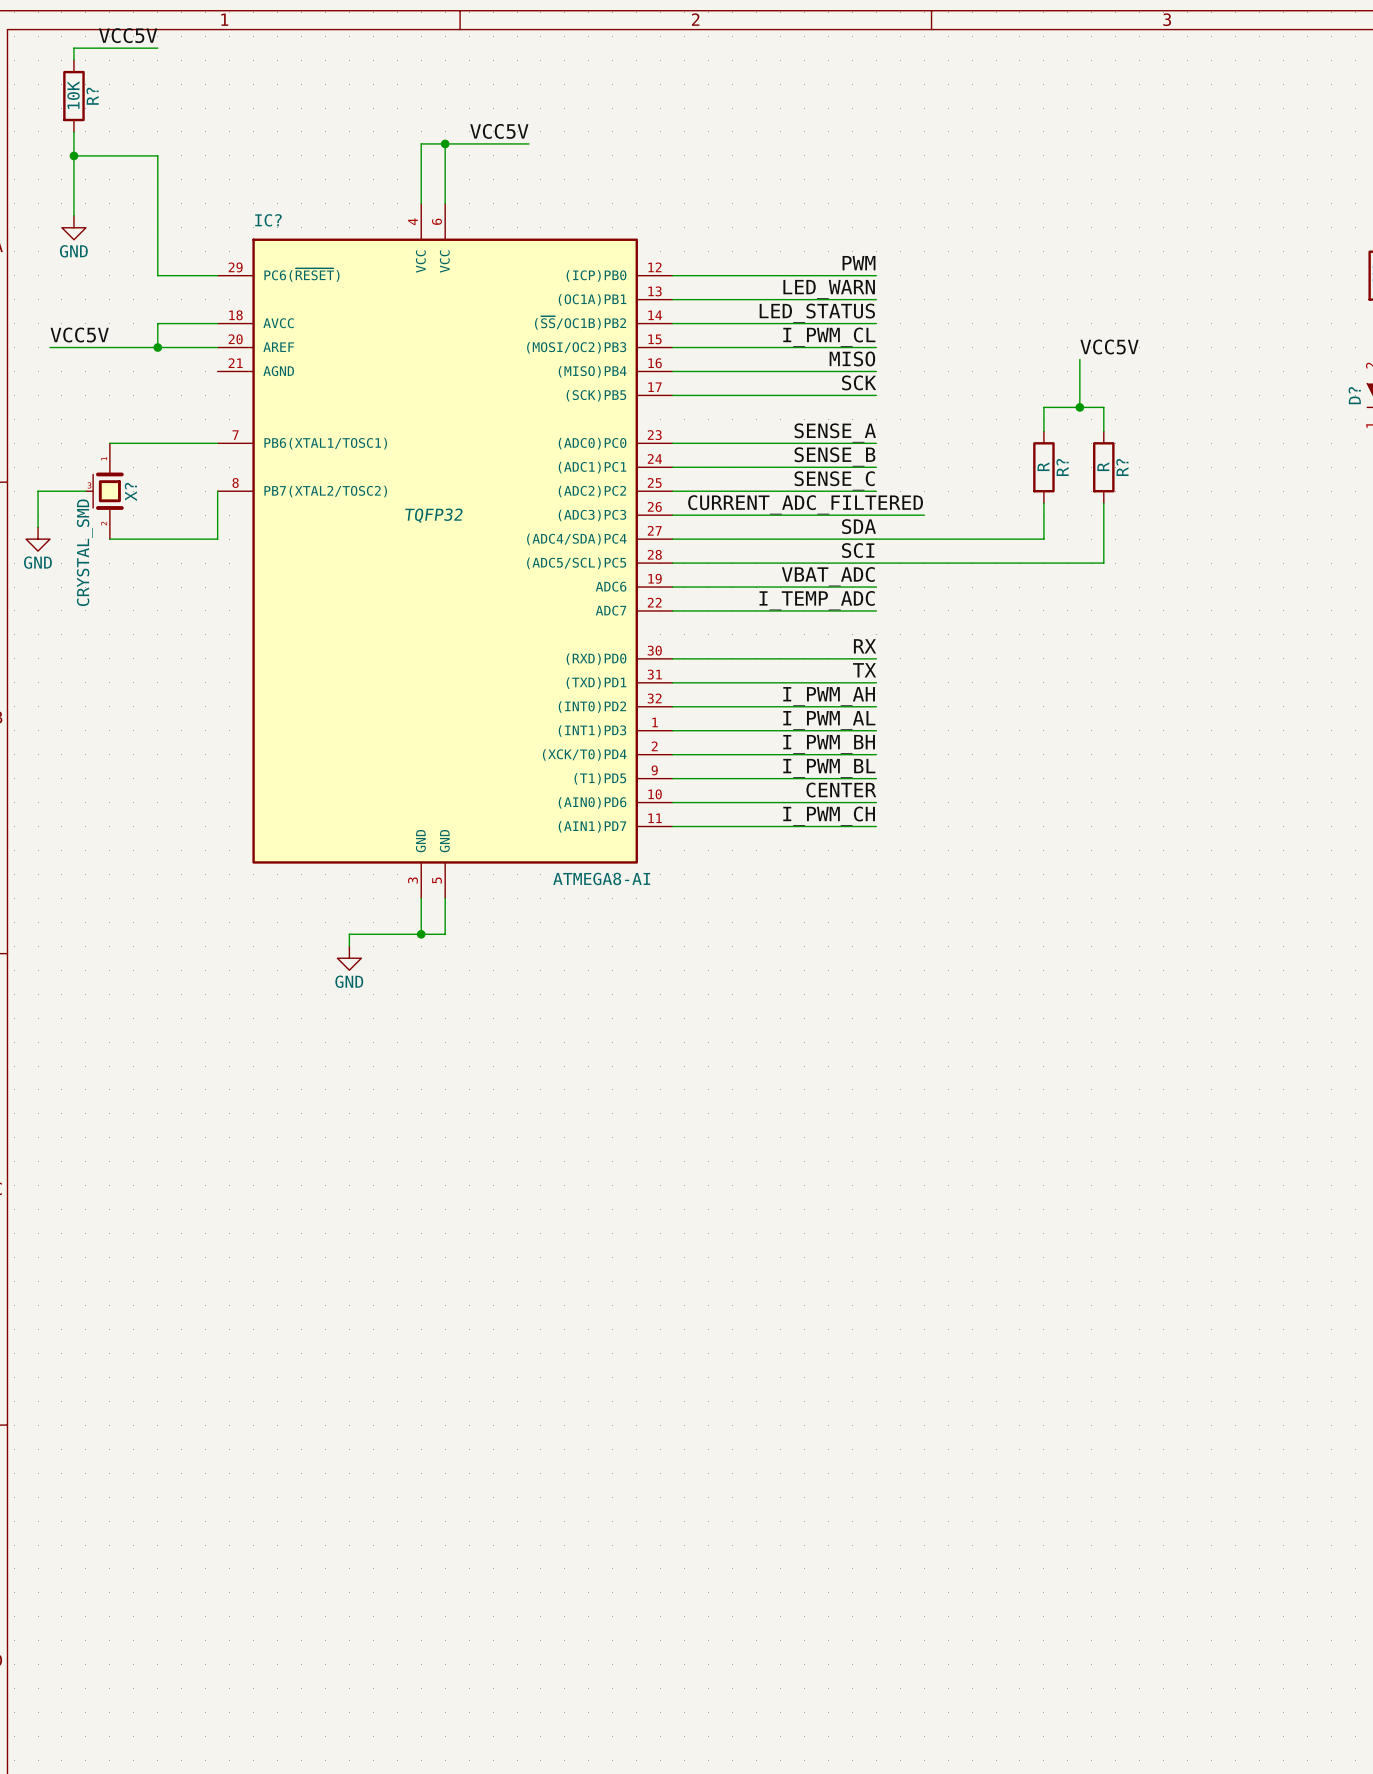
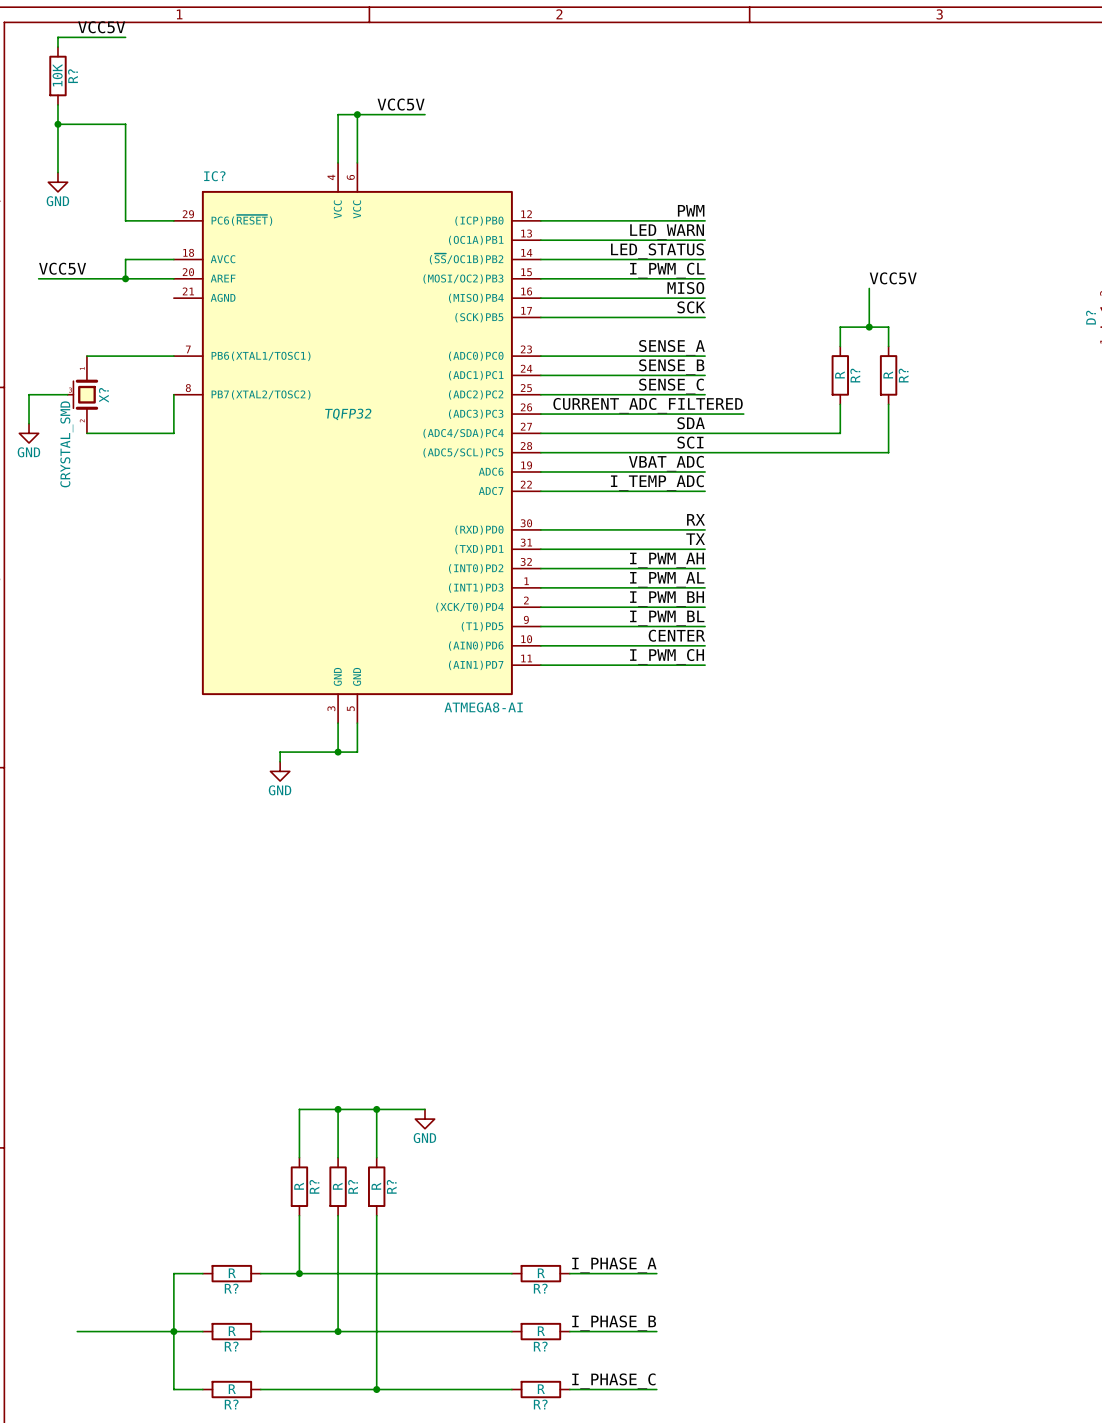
wire: none -> (338, 1109) (338, 1157)
junction: none -> (338, 1109)
wire: none -> (376, 1109) (376, 1157)
junction: none -> (376, 1109)
wire: none -> (424, 1109) (299, 1109) (299, 1157)
power symbol: none -> GND (424, 1119)
R?: none -> R (299, 1186)
R?: none -> R (338, 1186)
R?: none -> R (376, 1186)
wire: none -> (299, 1215) (299, 1273)
wire: none -> (338, 1215) (338, 1331)
wire: none -> (376, 1215) (376, 1389)
label: none -> I_PHASE_A (614, 1265)
wire: none -> (202, 1273) (173, 1273) (173, 1389) (202, 1389)
R?: none -> R (231, 1273)
wire: none -> (260, 1273) (511, 1273)
junction: none -> (299, 1273)
R?: none -> R (540, 1273)
wire: none -> (569, 1273) (656, 1273)
label: none -> I_PHASE_B (614, 1323)
wire: none -> (77, 1331) (202, 1331)
junction: none -> (173, 1331)
R?: none -> R (231, 1331)
wire: none -> (260, 1331) (511, 1331)
junction: none -> (338, 1331)
R?: none -> R (540, 1331)
wire: none -> (569, 1331) (656, 1331)
label: none -> I_PHASE_C (613, 1381)
R?: none -> R (231, 1389)
wire: none -> (260, 1389) (511, 1389)
junction: none -> (376, 1389)
R?: none -> R (540, 1389)
wire: none -> (569, 1389) (656, 1389)

